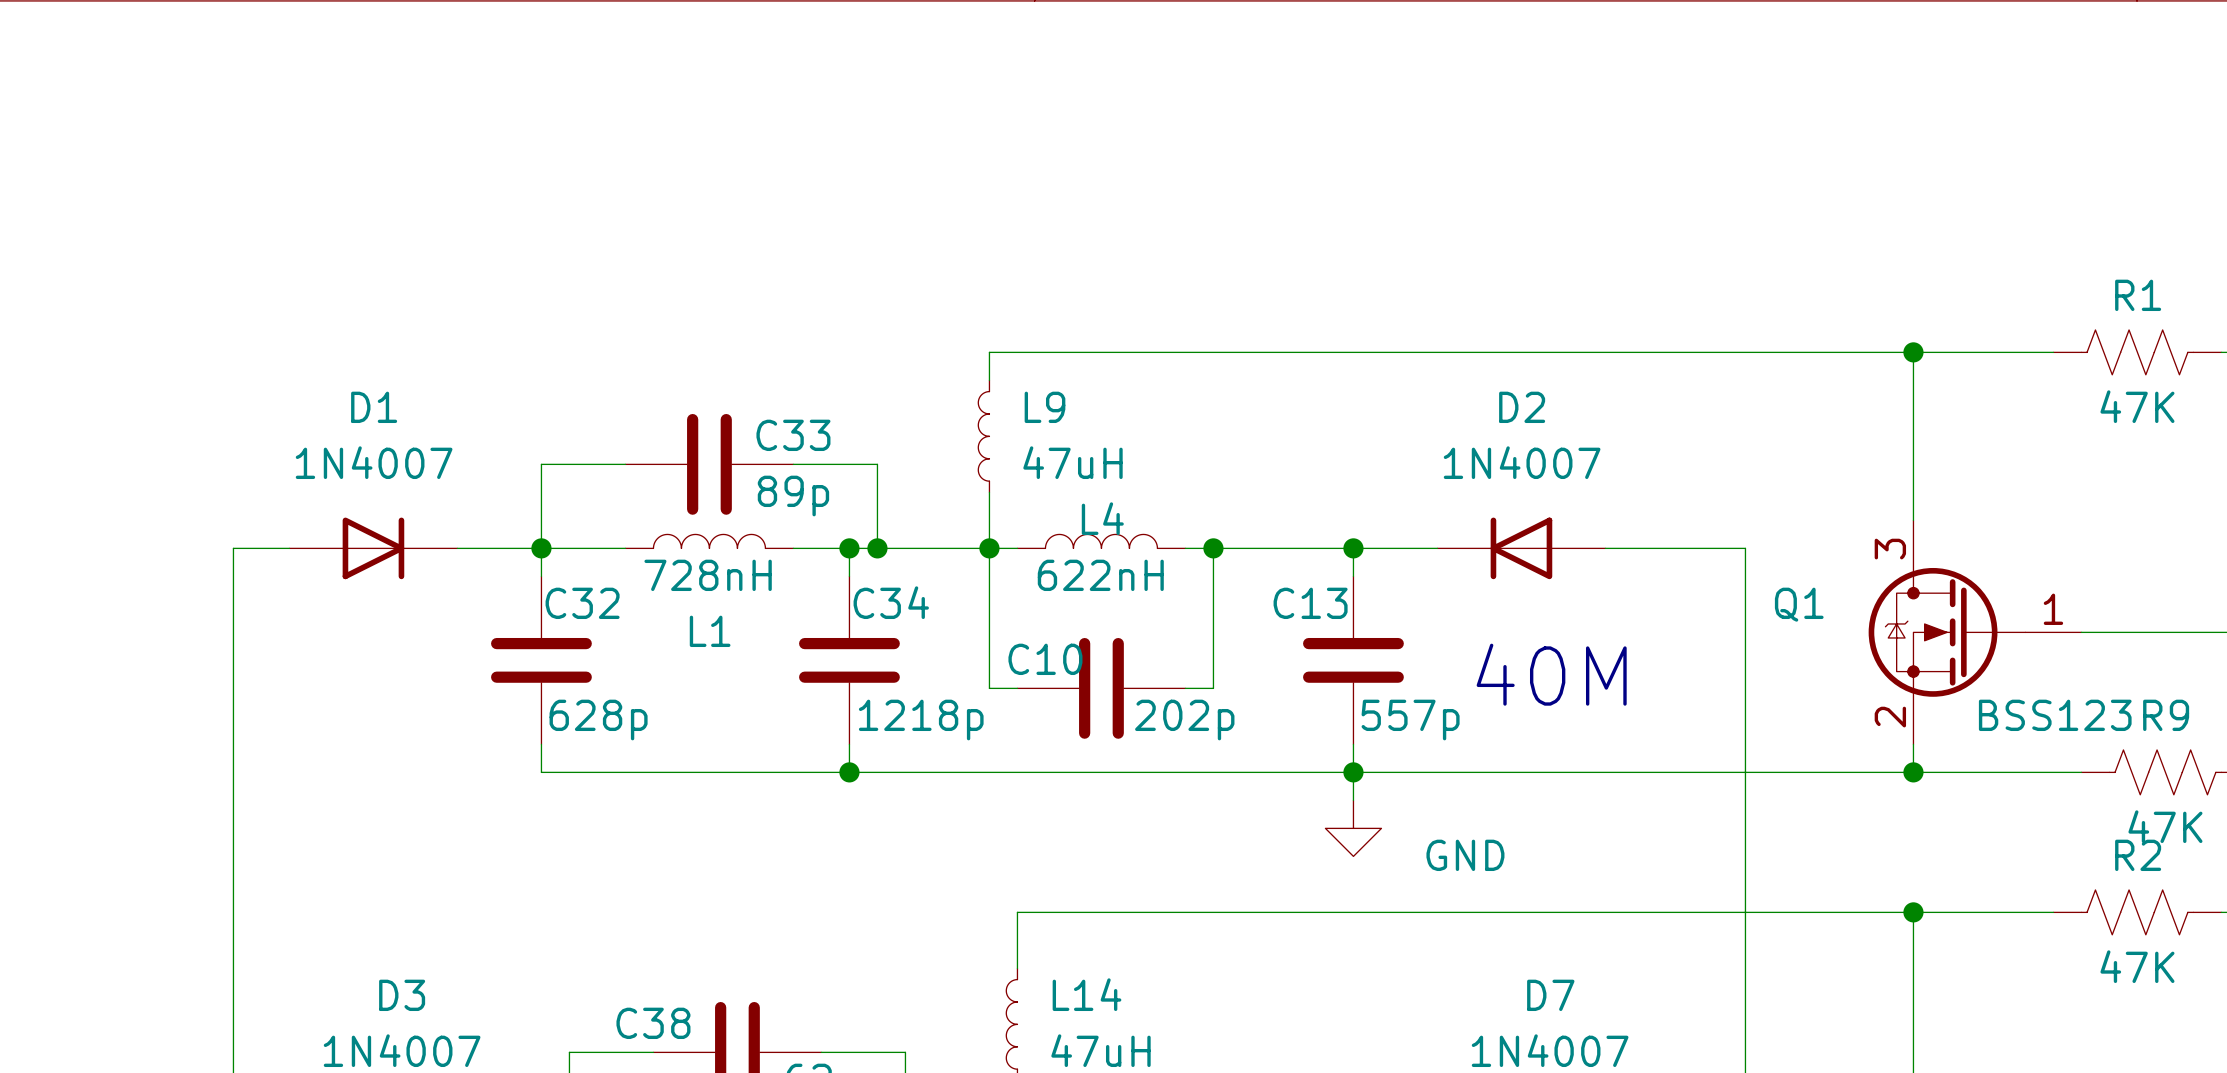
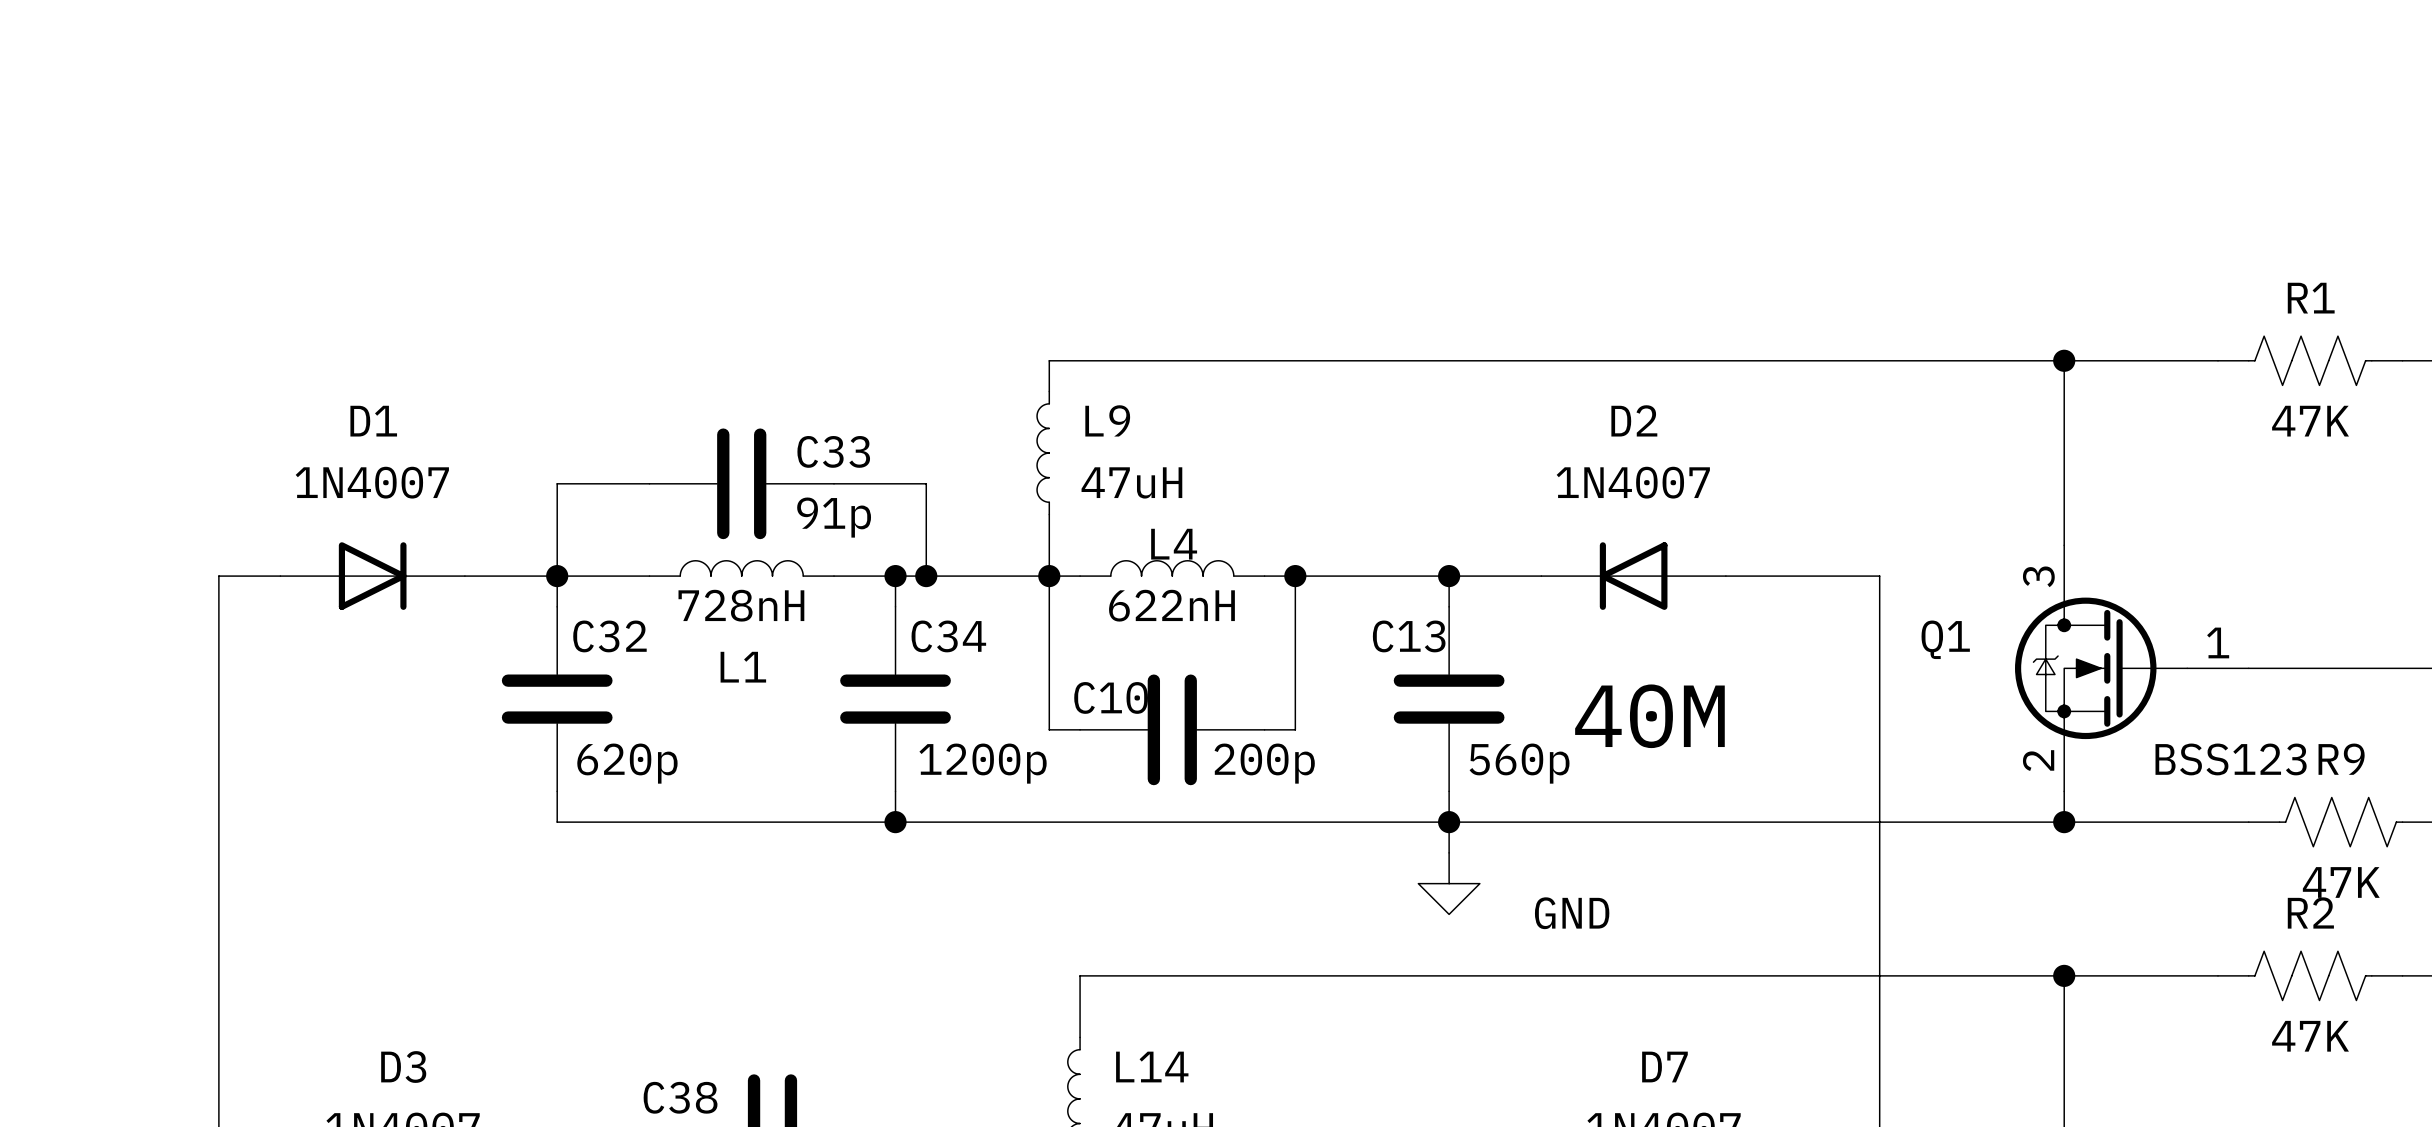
C33 value: 89p (793, 496) -> 91p (834, 517)
C32 value: 628p (598, 720) -> 620p (627, 763)
C34 value: 1218p (921, 720) -> 1200p (983, 763)
C10 value: 202p (1184, 720) -> 200p (1264, 763)
C13 value: 557p (1410, 720) -> 560p (1519, 763)

